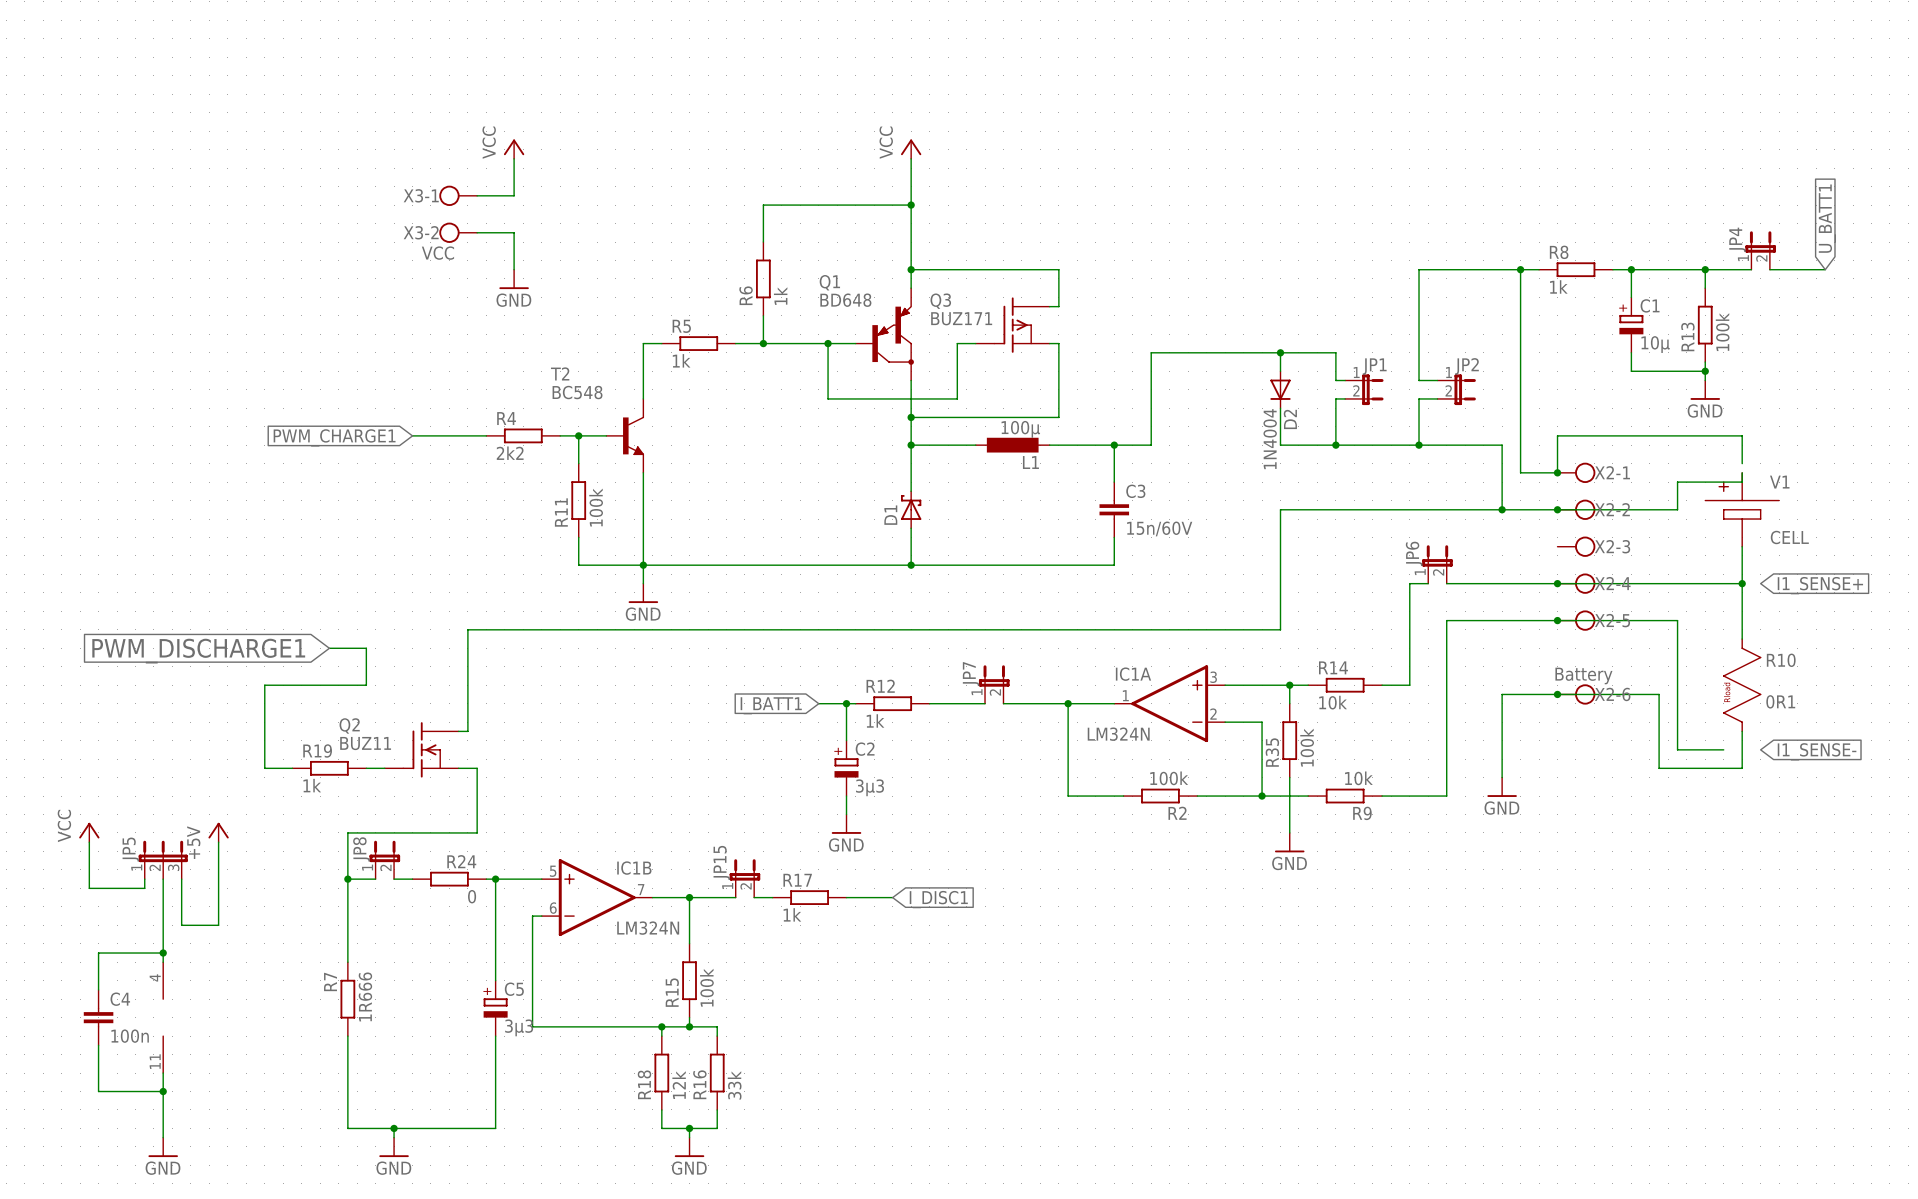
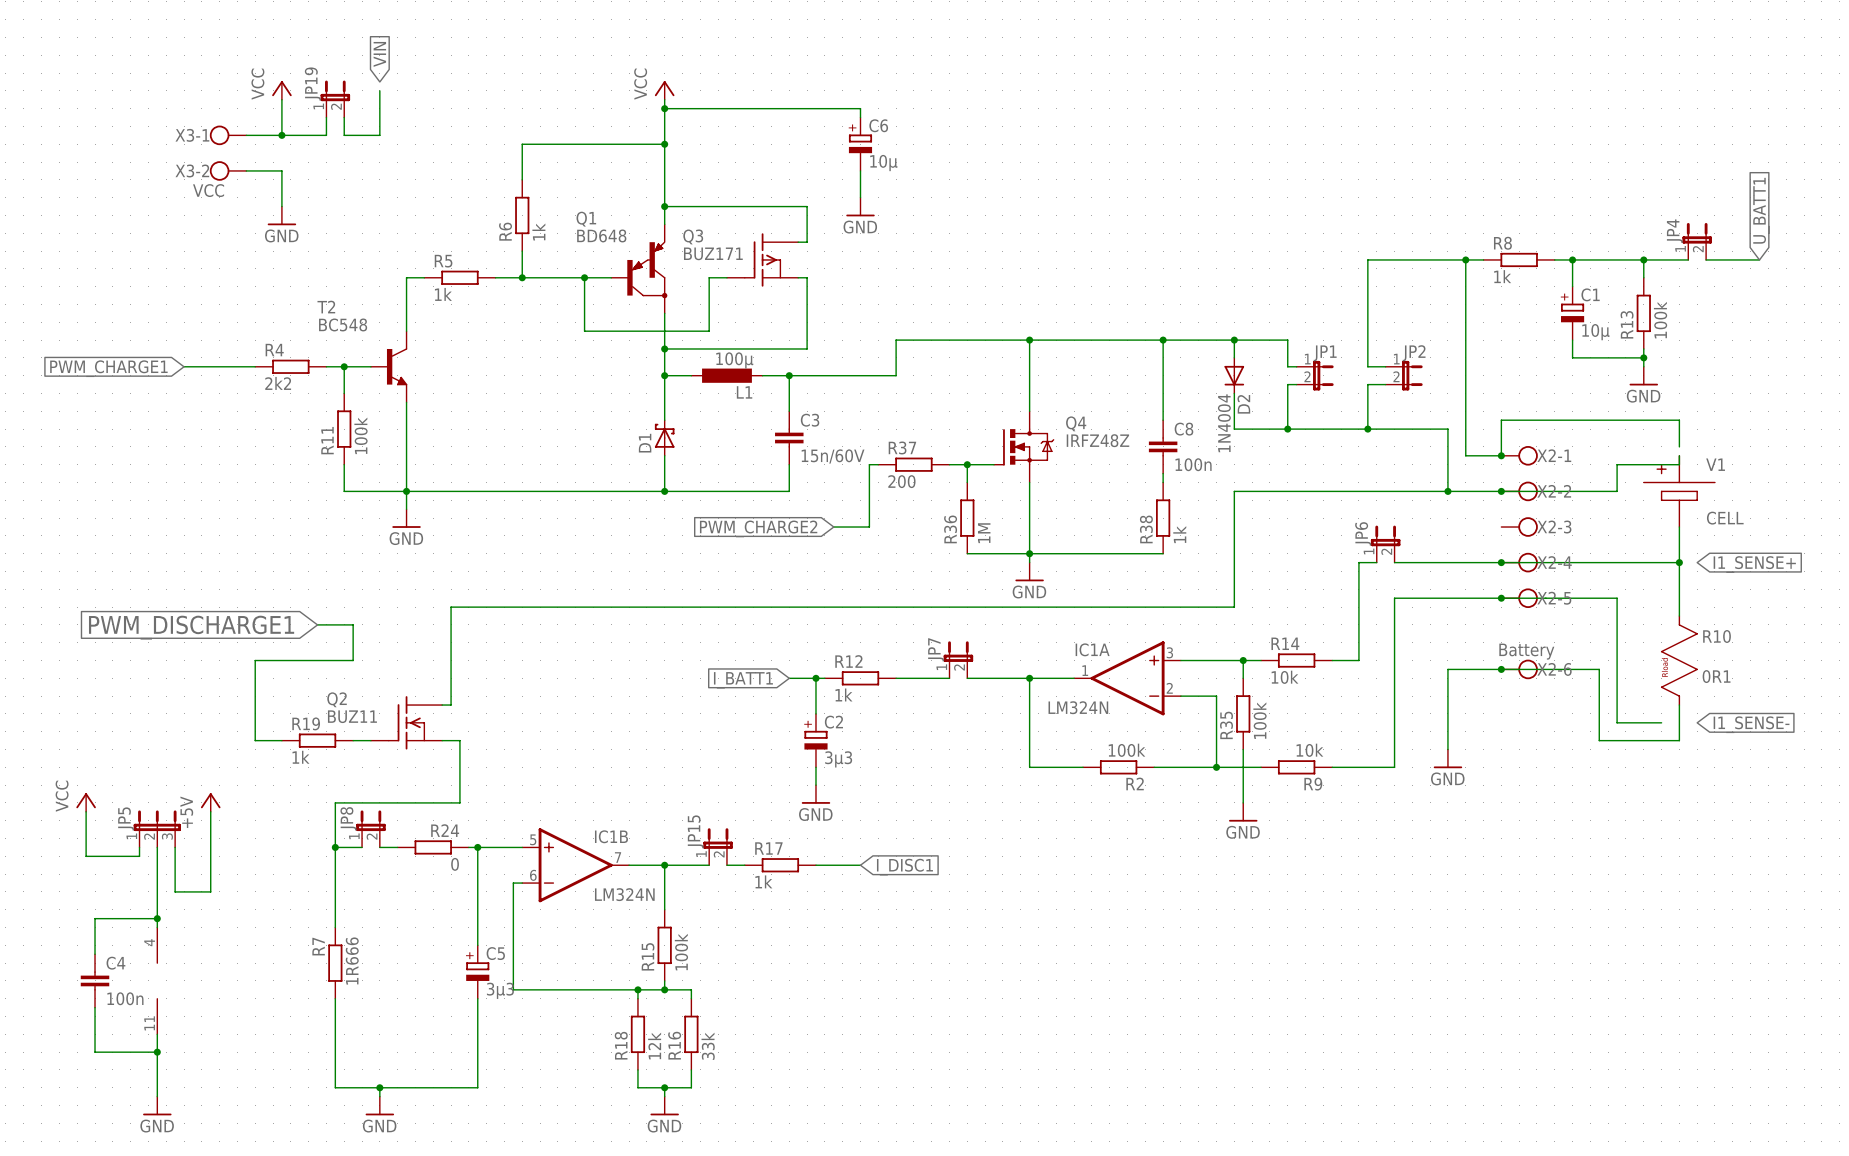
global label: none -> VIN (379, 54)
power symbol: none -> VCC (281, 90)
power symbol: none -> VCC (664, 90)
wire: none -> (379, 90) (379, 135) (344, 135) (344, 117)
JP19: none -> (335, 99)
wire: none -> (281, 99) (281, 135)
wire: none -> (664, 99) (664, 224)
wire: none -> (664, 108) (860, 108) (860, 117)
junction: none -> (664, 108)
wire: none -> (326, 117) (326, 135) (246, 135)
junction: none -> (281, 135)
power symbol: VCC (514, 149) -> none
wire: none -> (664, 144) (522, 144) (522, 179)
junction: none -> (664, 144)
C6: none -> 10µ (860, 144)
power symbol: VCC (911, 149) -> none
wire: (514, 158) (514, 195) (477, 195) -> none
wire: (911, 158) (911, 288) -> none
wire: none -> (246, 170) (281, 170) (281, 206)
wire: none -> (860, 170) (860, 197)
X3-1 position: (458, 195) -> (228, 135)
wire: (911, 205) (763, 205) (763, 242) -> none
junction: (911, 205) -> none
wire: none -> (664, 206) (807, 206) (807, 242) (798, 242)
junction: none -> (664, 206)
power symbol: none -> GND (860, 207)
power symbol: none -> GND (281, 215)
X3-2 position: (458, 232) -> (228, 170)
wire: (477, 232) (514, 232) (514, 269) -> none
wire: (911, 269) (1058, 269) (1058, 306) (1049, 306) -> none
junction: (911, 269) -> none
R6 position: (763, 278) -> (522, 215)
power symbol: GND (514, 279) -> none
wire: none -> (424, 277) (406, 277) (406, 331)
wire: none -> (495, 277) (611, 277)
junction: none -> (522, 277)
junction: none -> (584, 277)
wire: none -> (726, 277) (709, 277) (709, 331) (637, 331)
wire: none -> (798, 277) (807, 277) (807, 348) (664, 348)
wire: (763, 315) (763, 343) -> none
Q3 position: (1012, 325) -> (762, 259)
Q1 position: (884, 334) -> (639, 268)
wire: (643, 343) (643, 398) -> (620, 331) (584, 331) (584, 277)
R5 position: (698, 343) -> (459, 277)
wire: (735, 343) (855, 343) -> none
junction: (763, 343) -> none
wire: (828, 343) (828, 398) (957, 398) (957, 343) (975, 343) -> none
junction: (828, 343) -> none
wire: (1049, 343) (1058, 343) (1058, 417) (911, 417) -> none
wire: none -> (1029, 340) (1029, 411)
junction: none -> (1029, 340)
wire: (1151, 352) (1151, 445) (1049, 445) -> (1109, 340) (896, 340) (896, 375) (762, 375)
wire: none -> (1163, 340) (1163, 420)
junction: none -> (1163, 340)
junction: none -> (664, 348)
wire: none -> (184, 366) (255, 366)
wire: none -> (326, 366) (370, 366)
wire: none -> (344, 366) (344, 393)
junction: none -> (344, 366)
wire: (911, 380) (911, 491) -> none
global label: none -> PWM_CHARGE1 (108, 368)
wire: none -> (664, 375) (691, 375)
junction: none -> (664, 375)
junction: none -> (789, 375)
wire: none -> (406, 402) (406, 509)
junction: (911, 417) -> none
wire: (412, 435) (486, 435) -> none
R4 position: (523, 435) -> (290, 366)
wire: (560, 435) (606, 435) -> none
wire: (578, 435) (578, 463) -> (522, 251) (522, 277)
junction: (578, 435) -> none
T2 position: (625, 435) -> (389, 366)
global label: PWM_CHARGE1 (334, 437) -> none
wire: (911, 445) (975, 445) -> none
junction: (911, 445) -> none
L1 position: (1012, 445) -> (726, 375)
wire: (1114, 445) (1114, 482) -> none
junction: (1114, 445) -> none
Q4: none -> IRFZ48Z (1023, 446)
C8: none -> 100n (1163, 446)
wire: (643, 472) (643, 583) -> (664, 313) (664, 420)
wire: none -> (664, 455) (664, 491)
wire: none -> (344, 464) (344, 491) (789, 491) (789, 464)
wire: none -> (878, 464) (869, 464) (869, 527) (833, 527)
R37: none -> 200 (913, 464)
wire: none -> (949, 464) (994, 464)
wire: none -> (967, 464) (967, 482)
junction: none -> (967, 464)
wire: none -> (1163, 473) (1163, 482)
R11 position: (578, 500) -> (344, 429)
wire: none -> (1029, 482) (1029, 562)
junction: none -> (406, 491)
junction: none -> (664, 491)
D1 position: (911, 509) -> (664, 438)
C3 position: (1114, 509) -> (789, 438)
wire: (911, 528) (911, 565) -> (789, 375) (789, 411)
power symbol: none -> GND (406, 518)
wire: (578, 537) (578, 565) (1114, 565) (1114, 537) -> none
R36: none -> 1M (967, 518)
R38: none -> 1k (1163, 518)
global label: none -> PWM_CHARGE2 (758, 528)
junction: (643, 565) -> none
junction: (911, 565) -> none
wire: none -> (967, 553) (1163, 553)
junction: none -> (1029, 553)
power symbol: GND (643, 593) -> none
power symbol: none -> GND (1029, 571)

